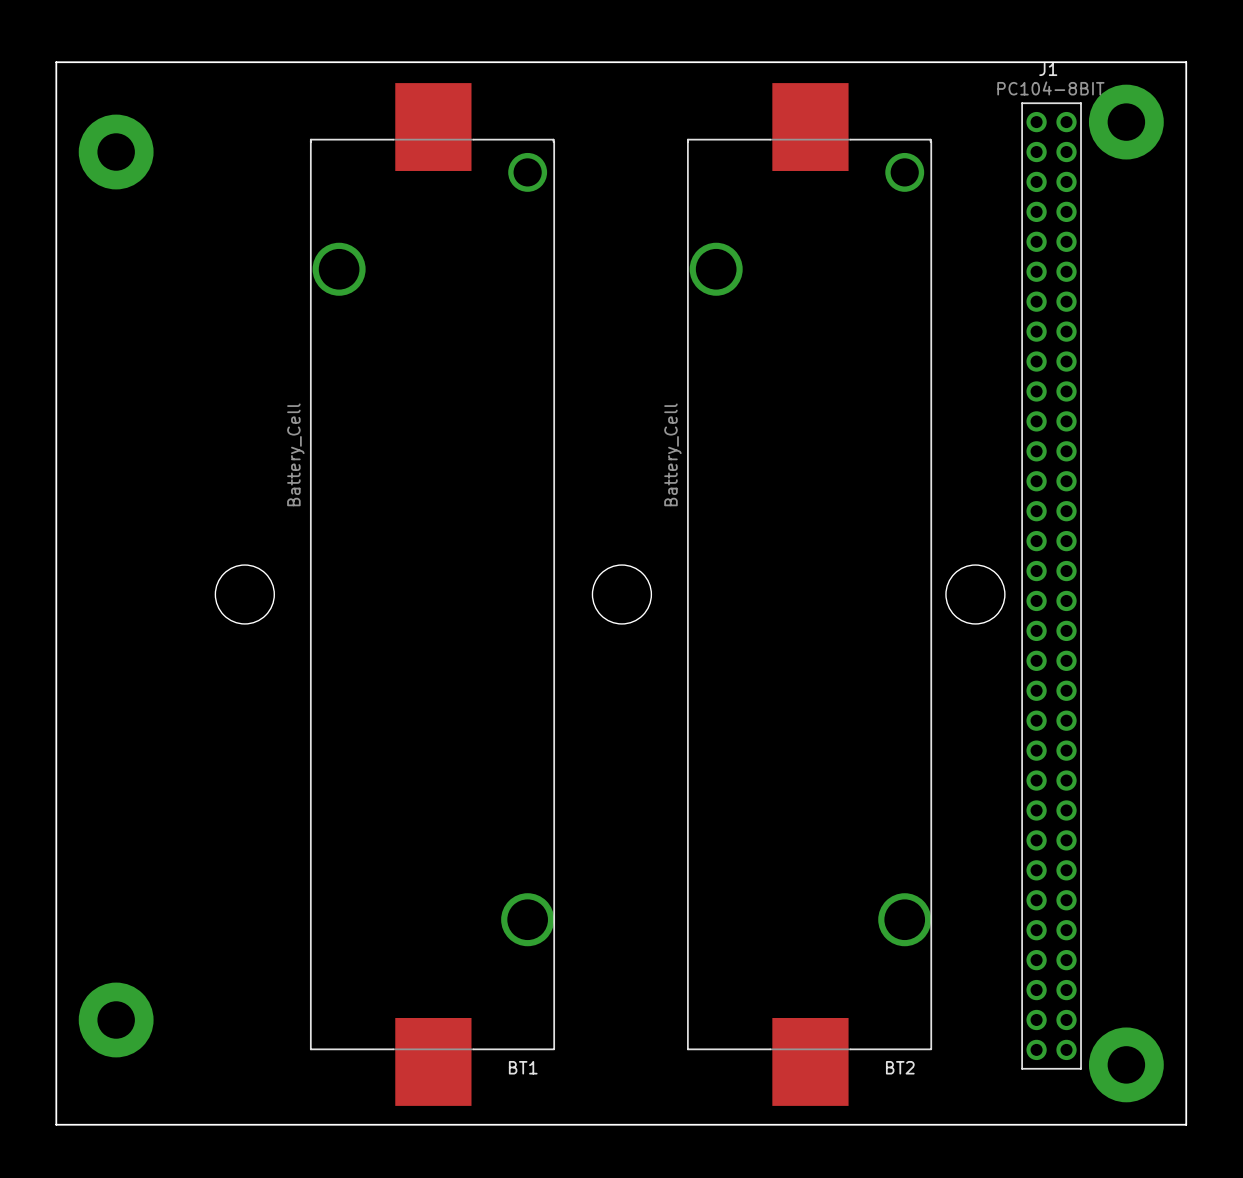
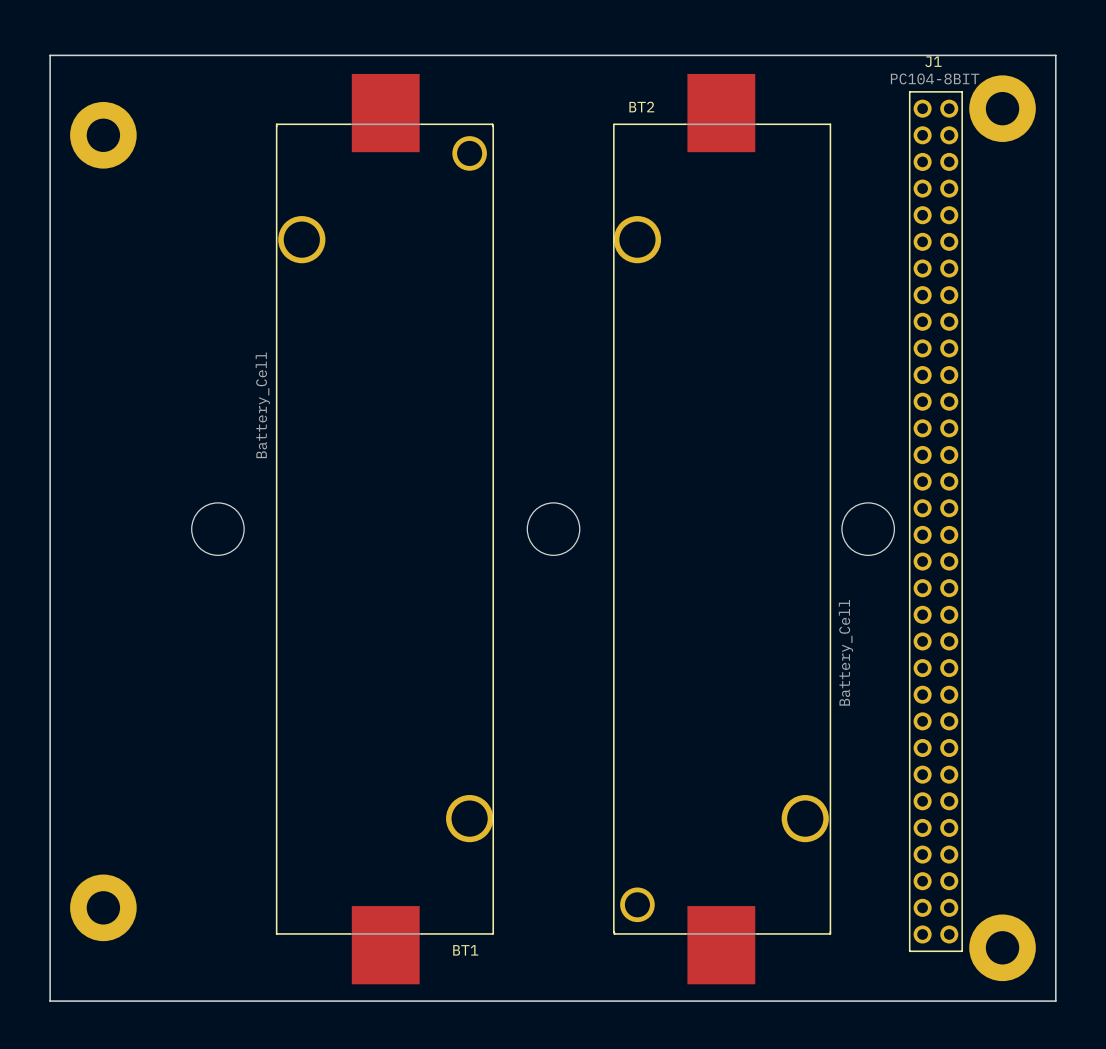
BT2 rotation: 0° (809, 594) -> 180° (722, 529)

